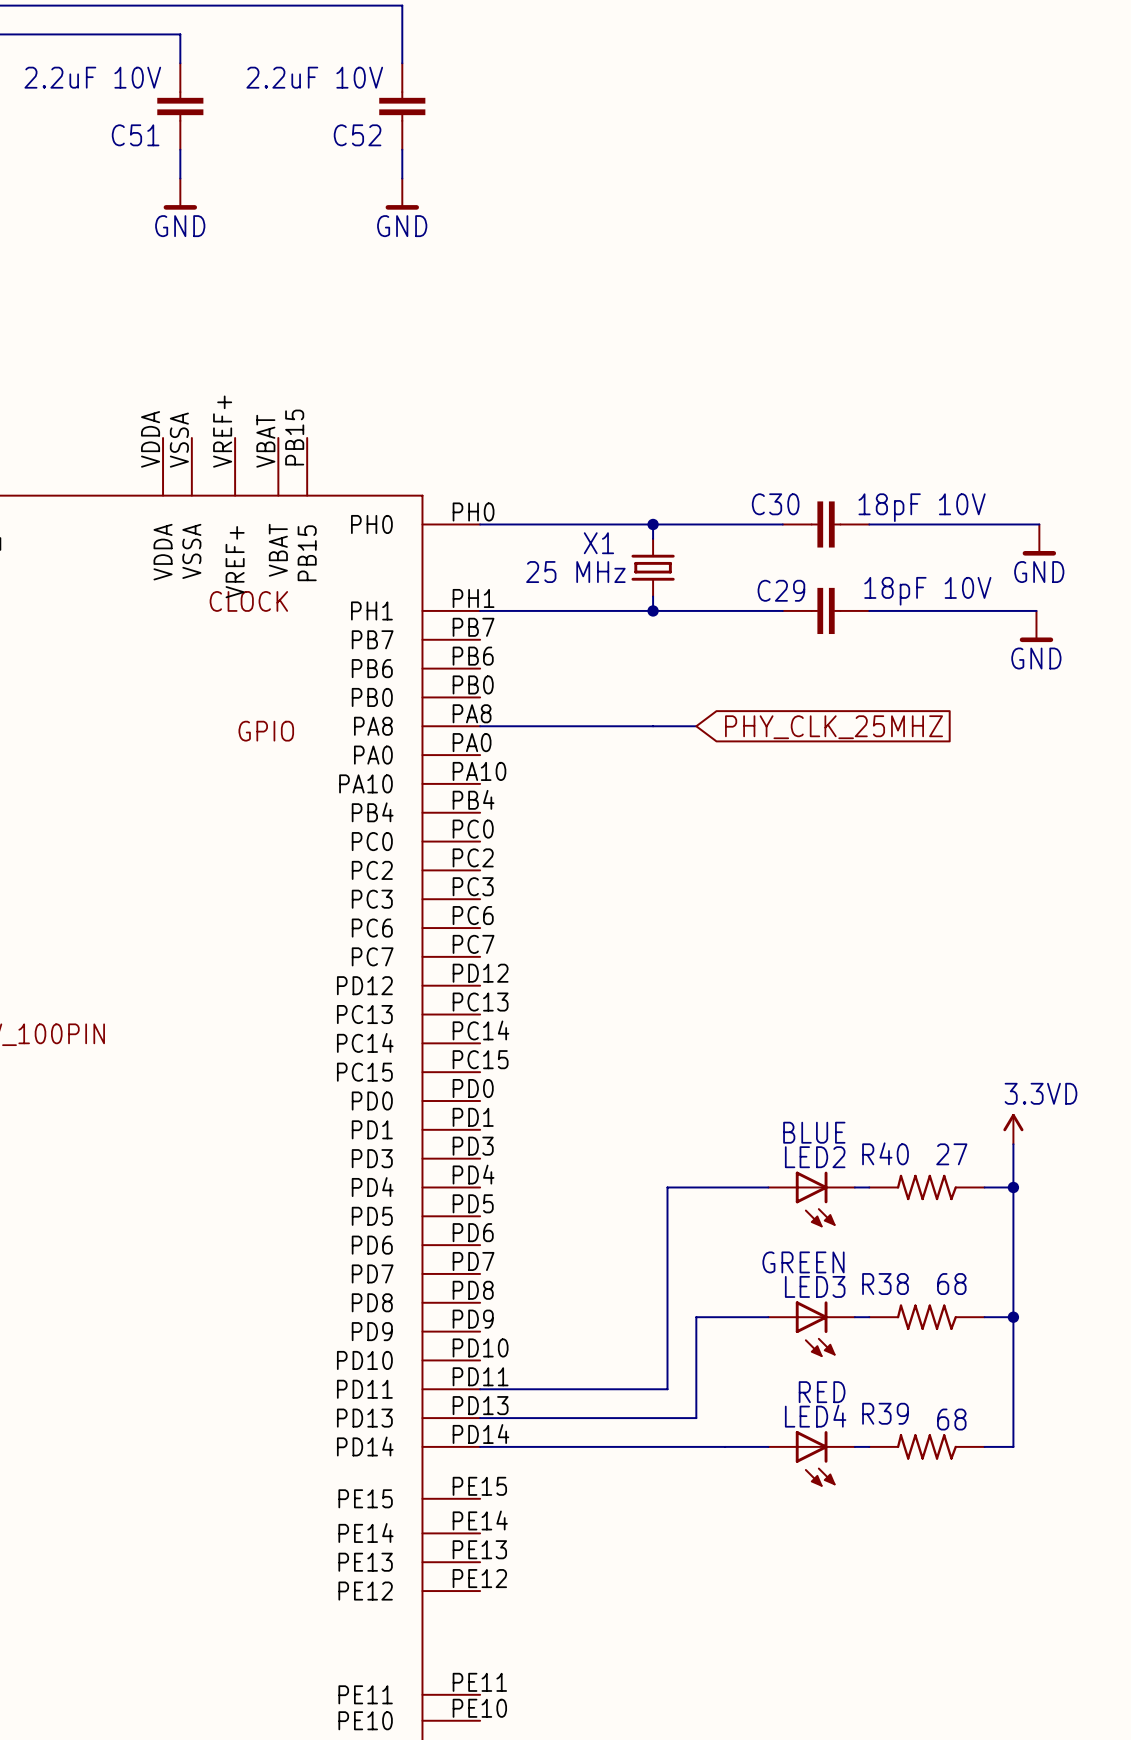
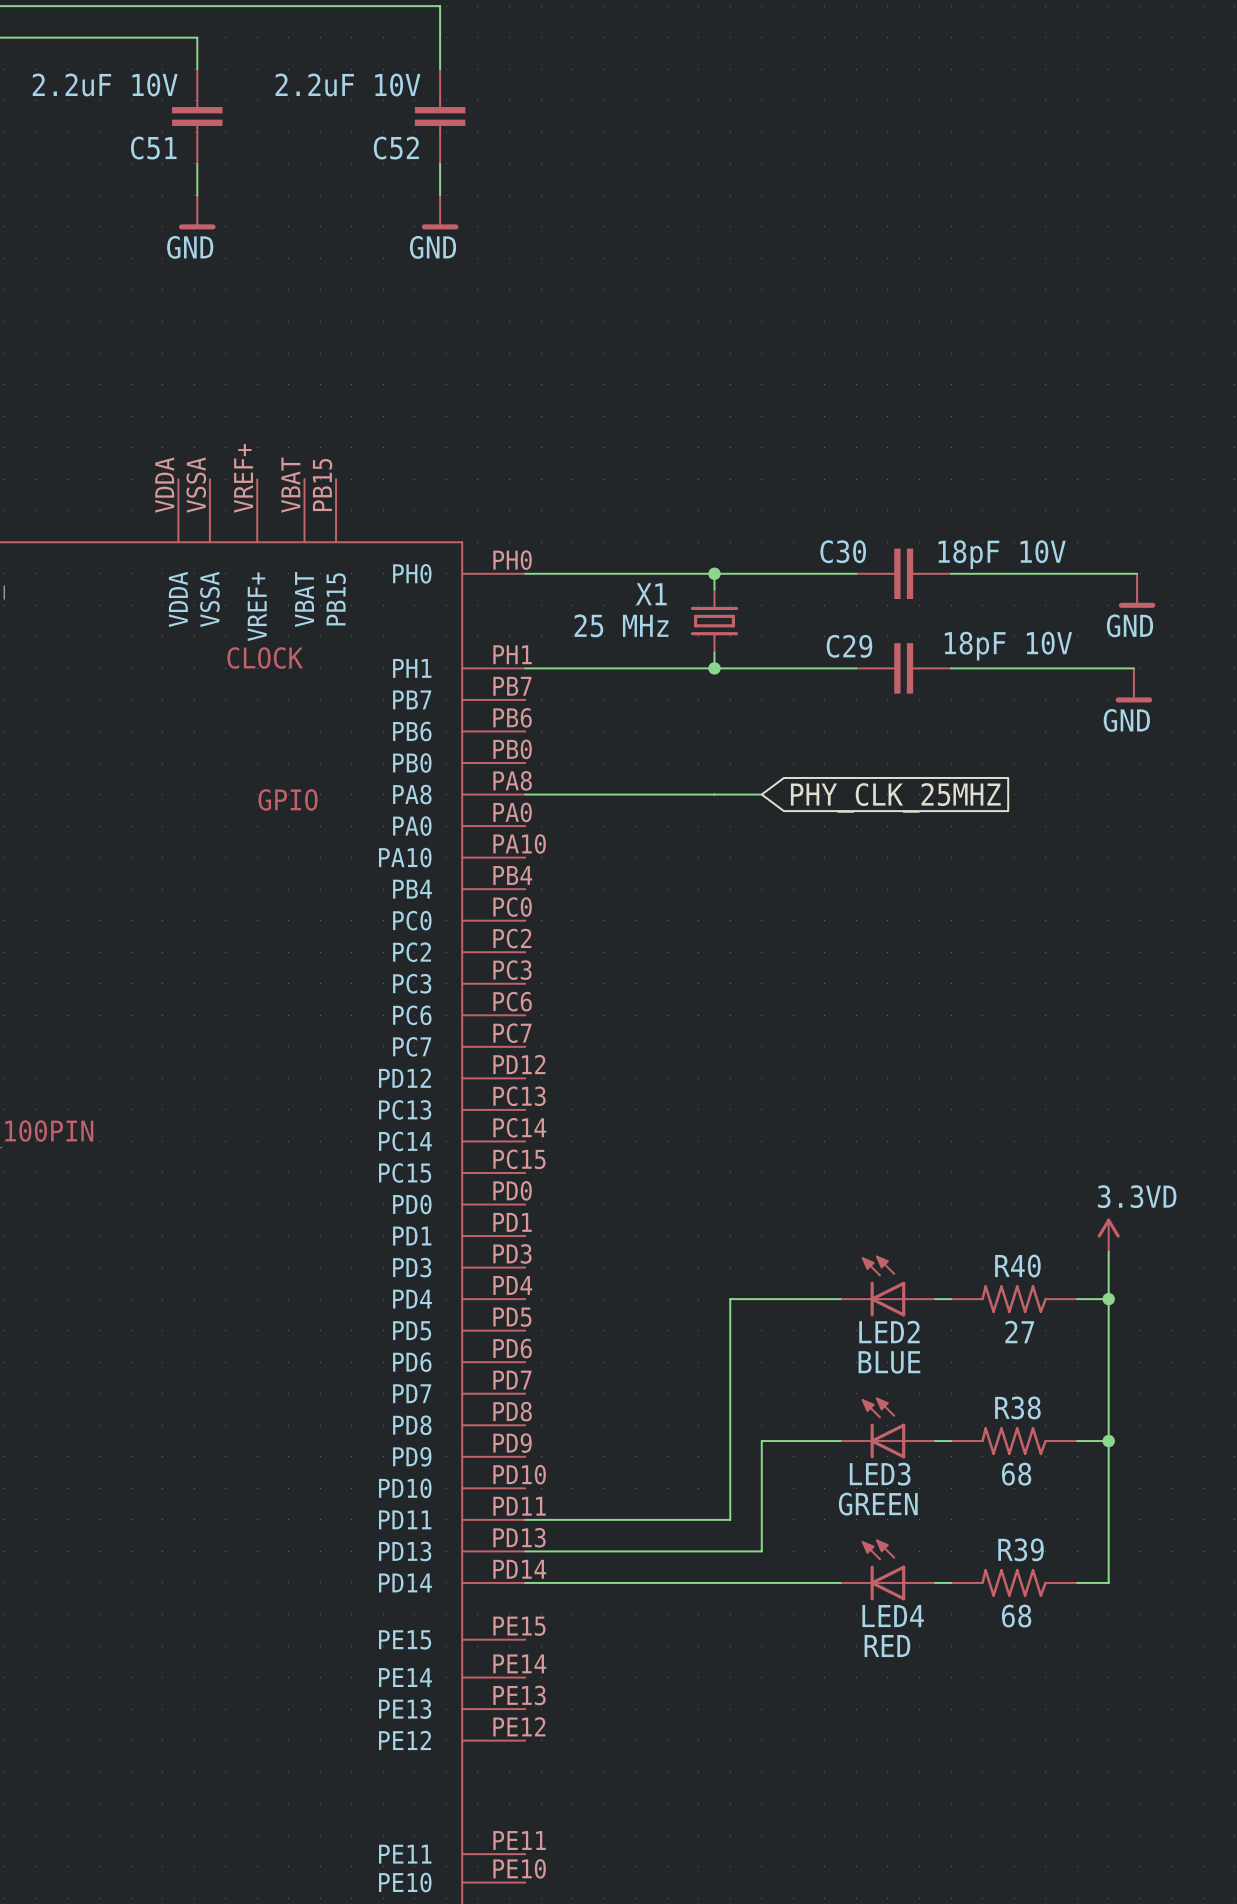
R40 name position: R40 (885, 1153) -> R40 (1017, 1266)
R40 value position: 27 (951, 1154) -> 27 (1019, 1332)
LED2 rotation: 0° (815, 1199) -> 180° (883, 1286)
R38 name position: R38 (885, 1284) -> R38 (1017, 1407)
R38 value position: 68 (951, 1284) -> 68 (1016, 1474)
LED3 rotation: 0° (815, 1329) -> 180° (883, 1427)
R39 name position: R39 (885, 1413) -> R39 (1021, 1549)
R39 value position: 68 (951, 1419) -> 68 (1016, 1616)
LED4 rotation: 0° (815, 1458) -> 180° (883, 1569)

